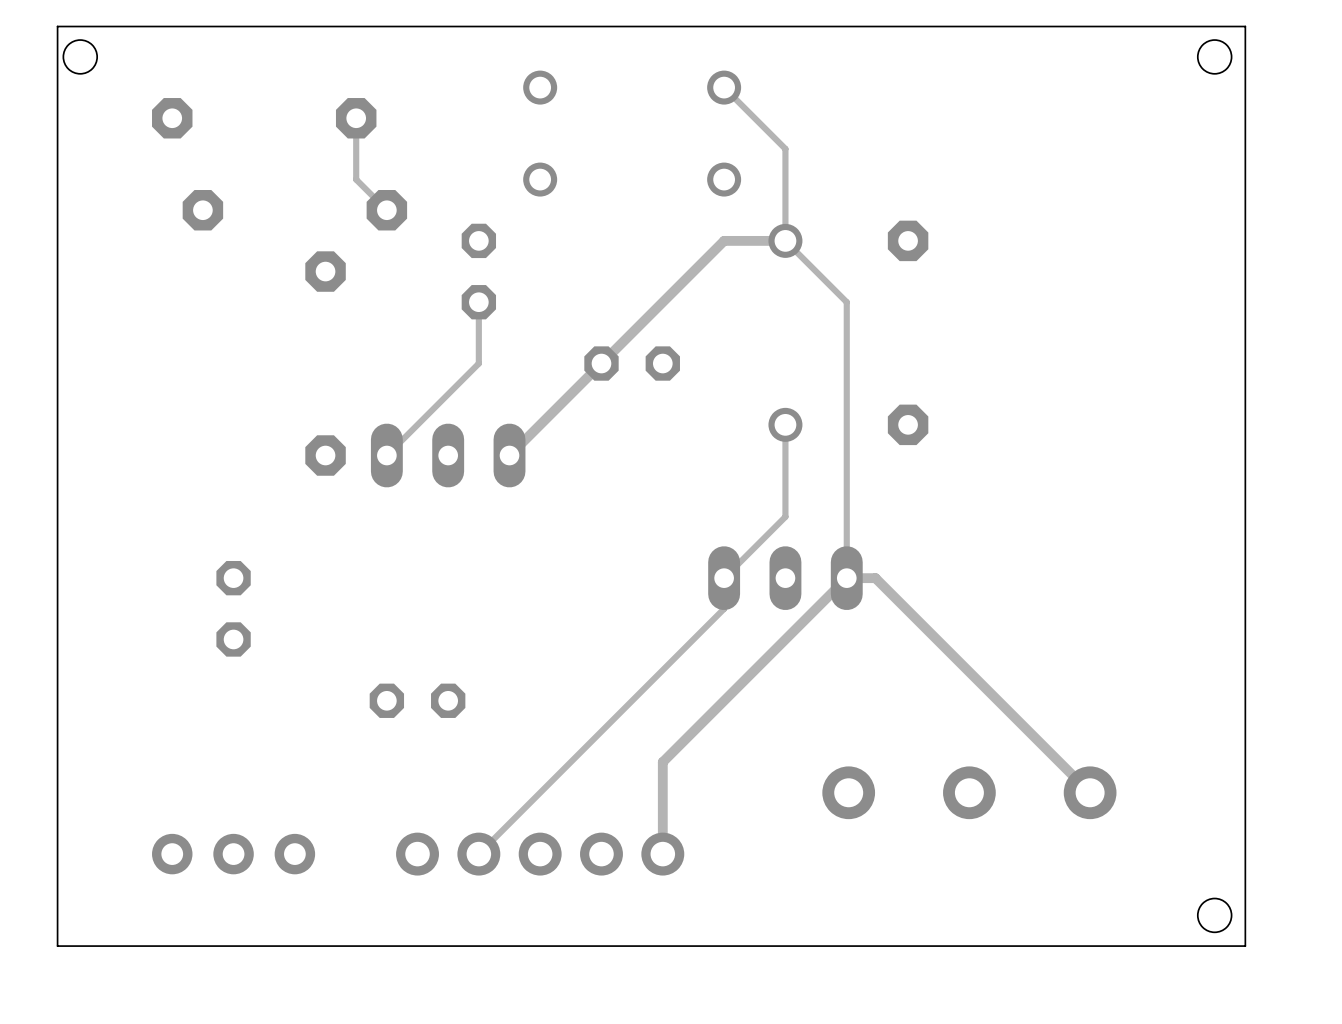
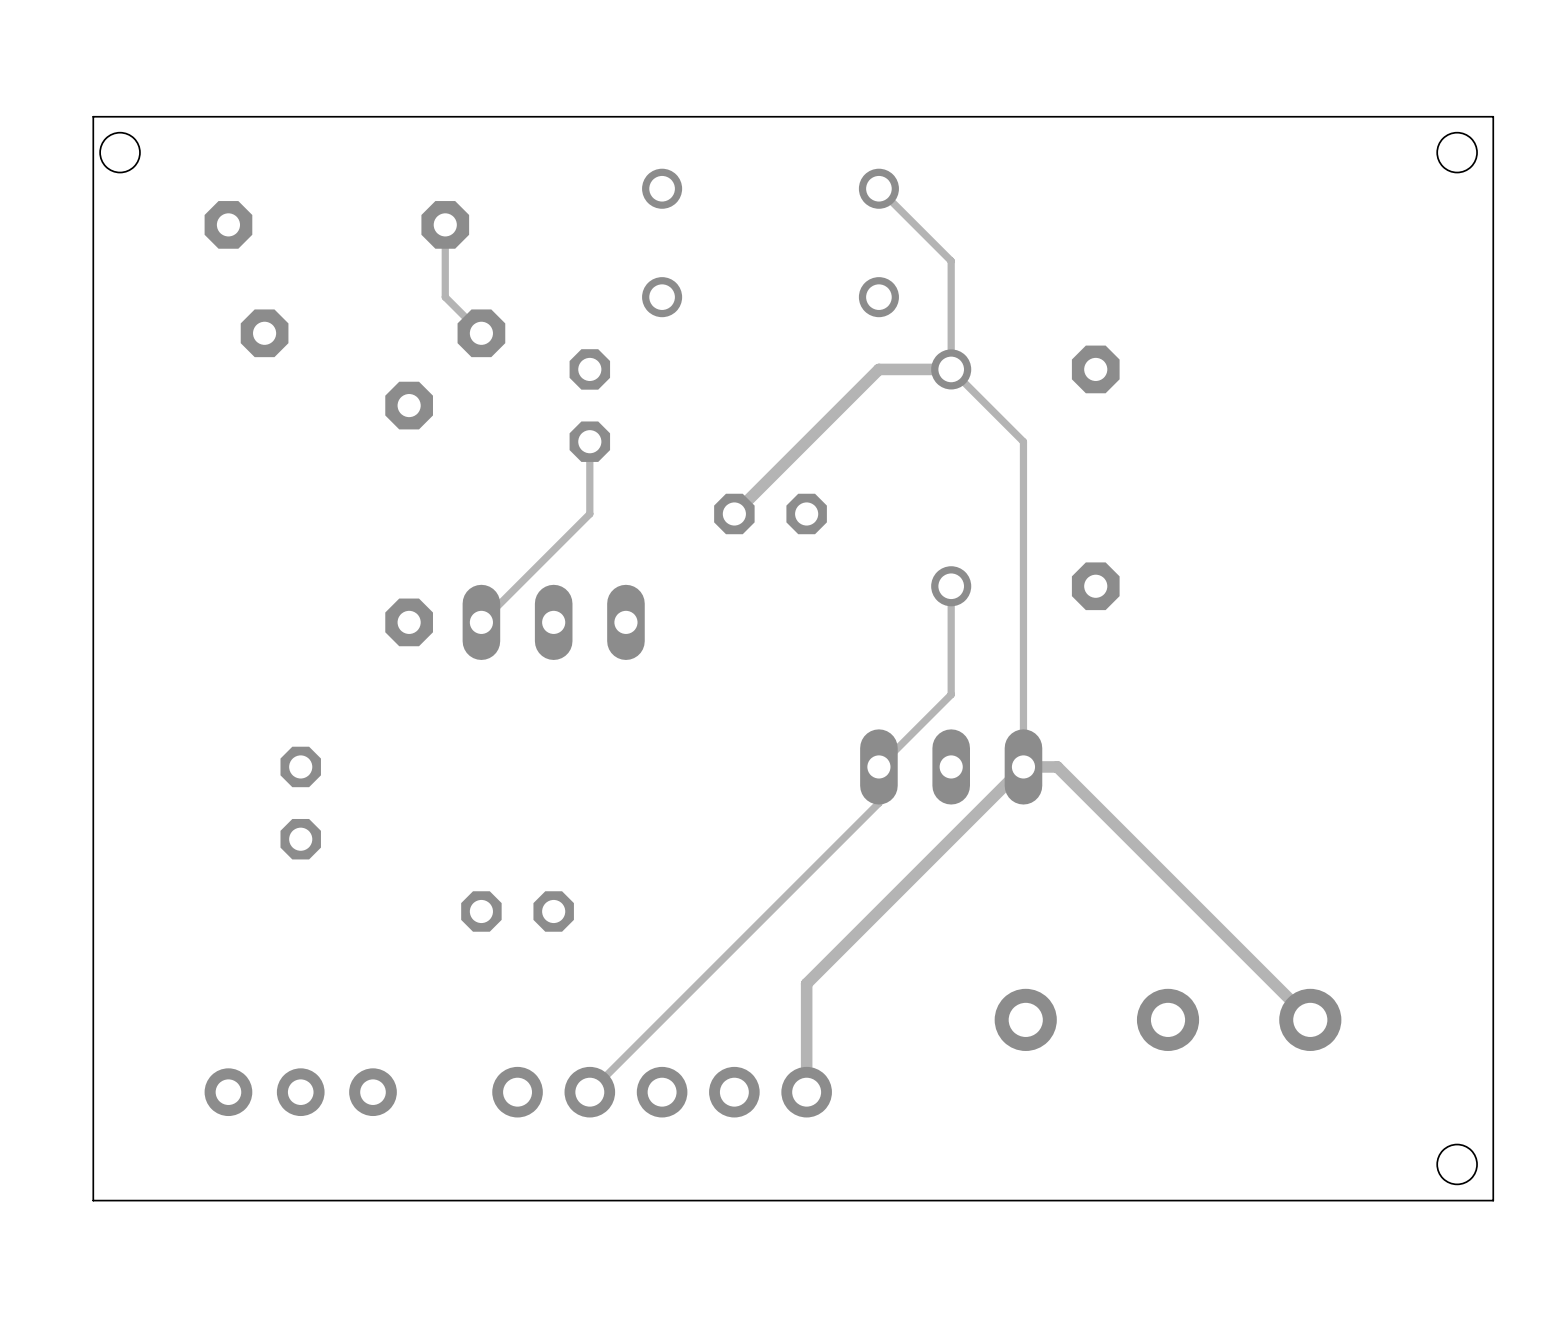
track: (601, 363) (509, 455) -> none

